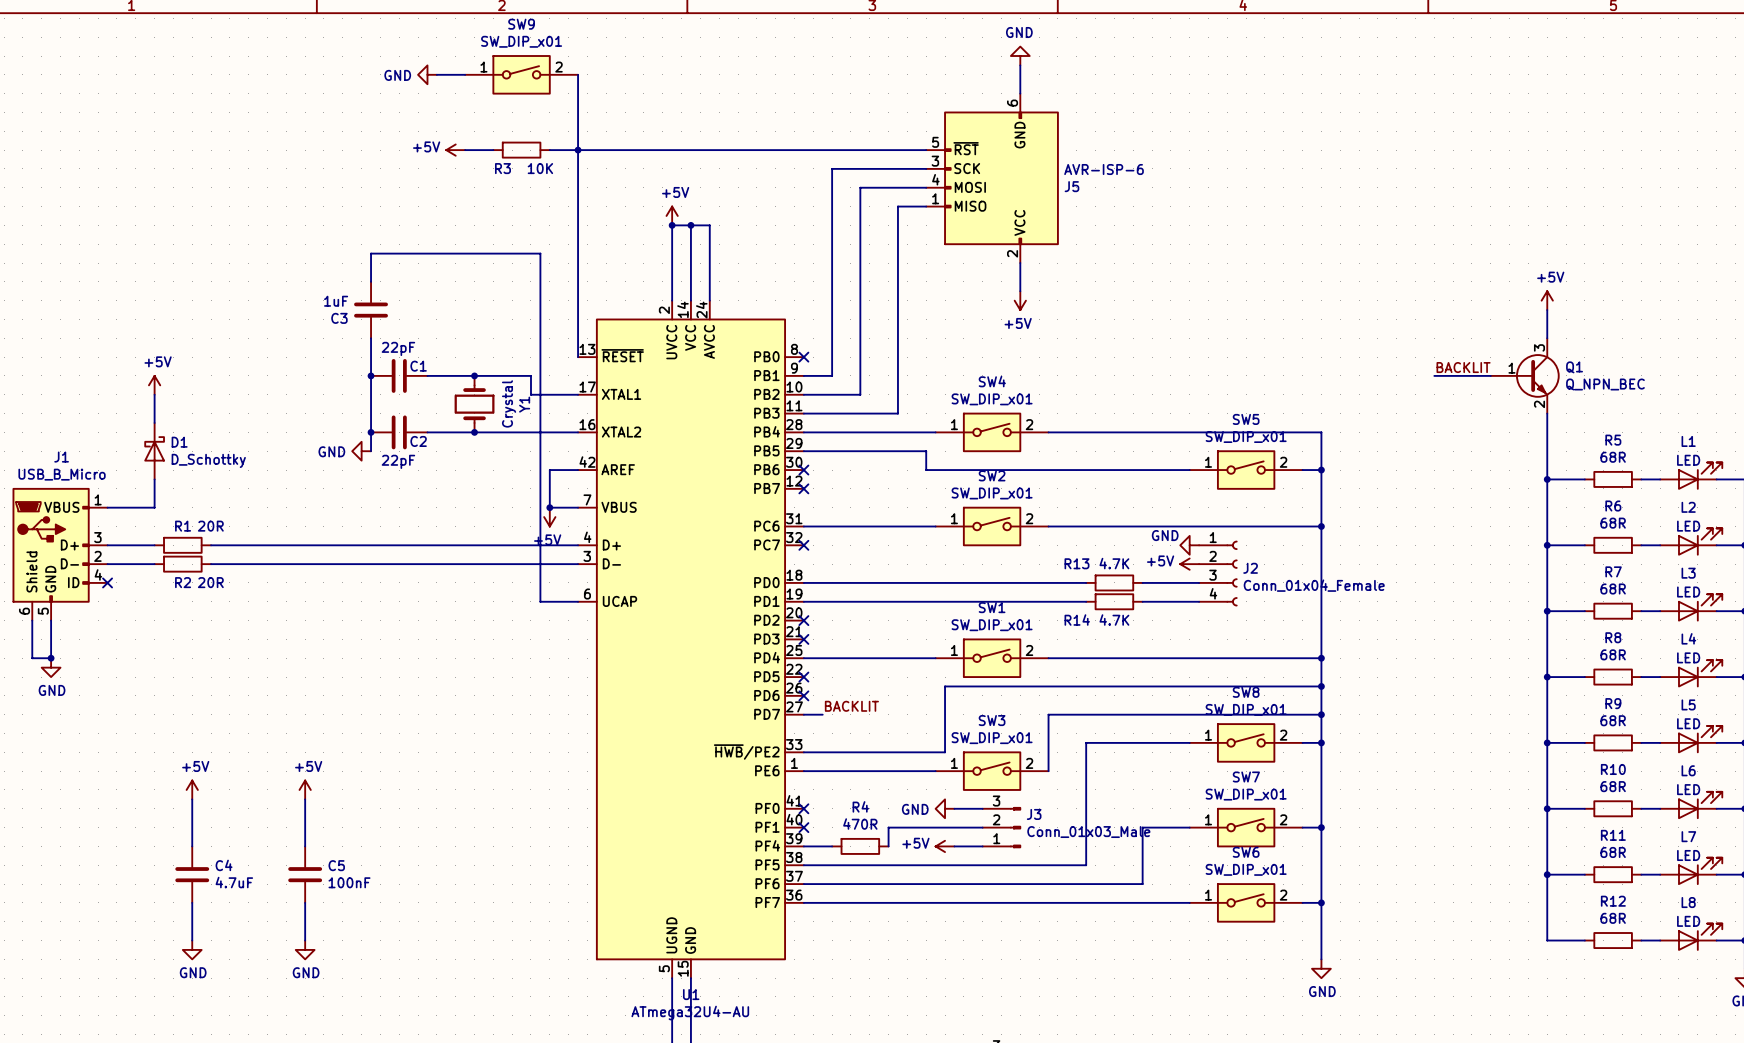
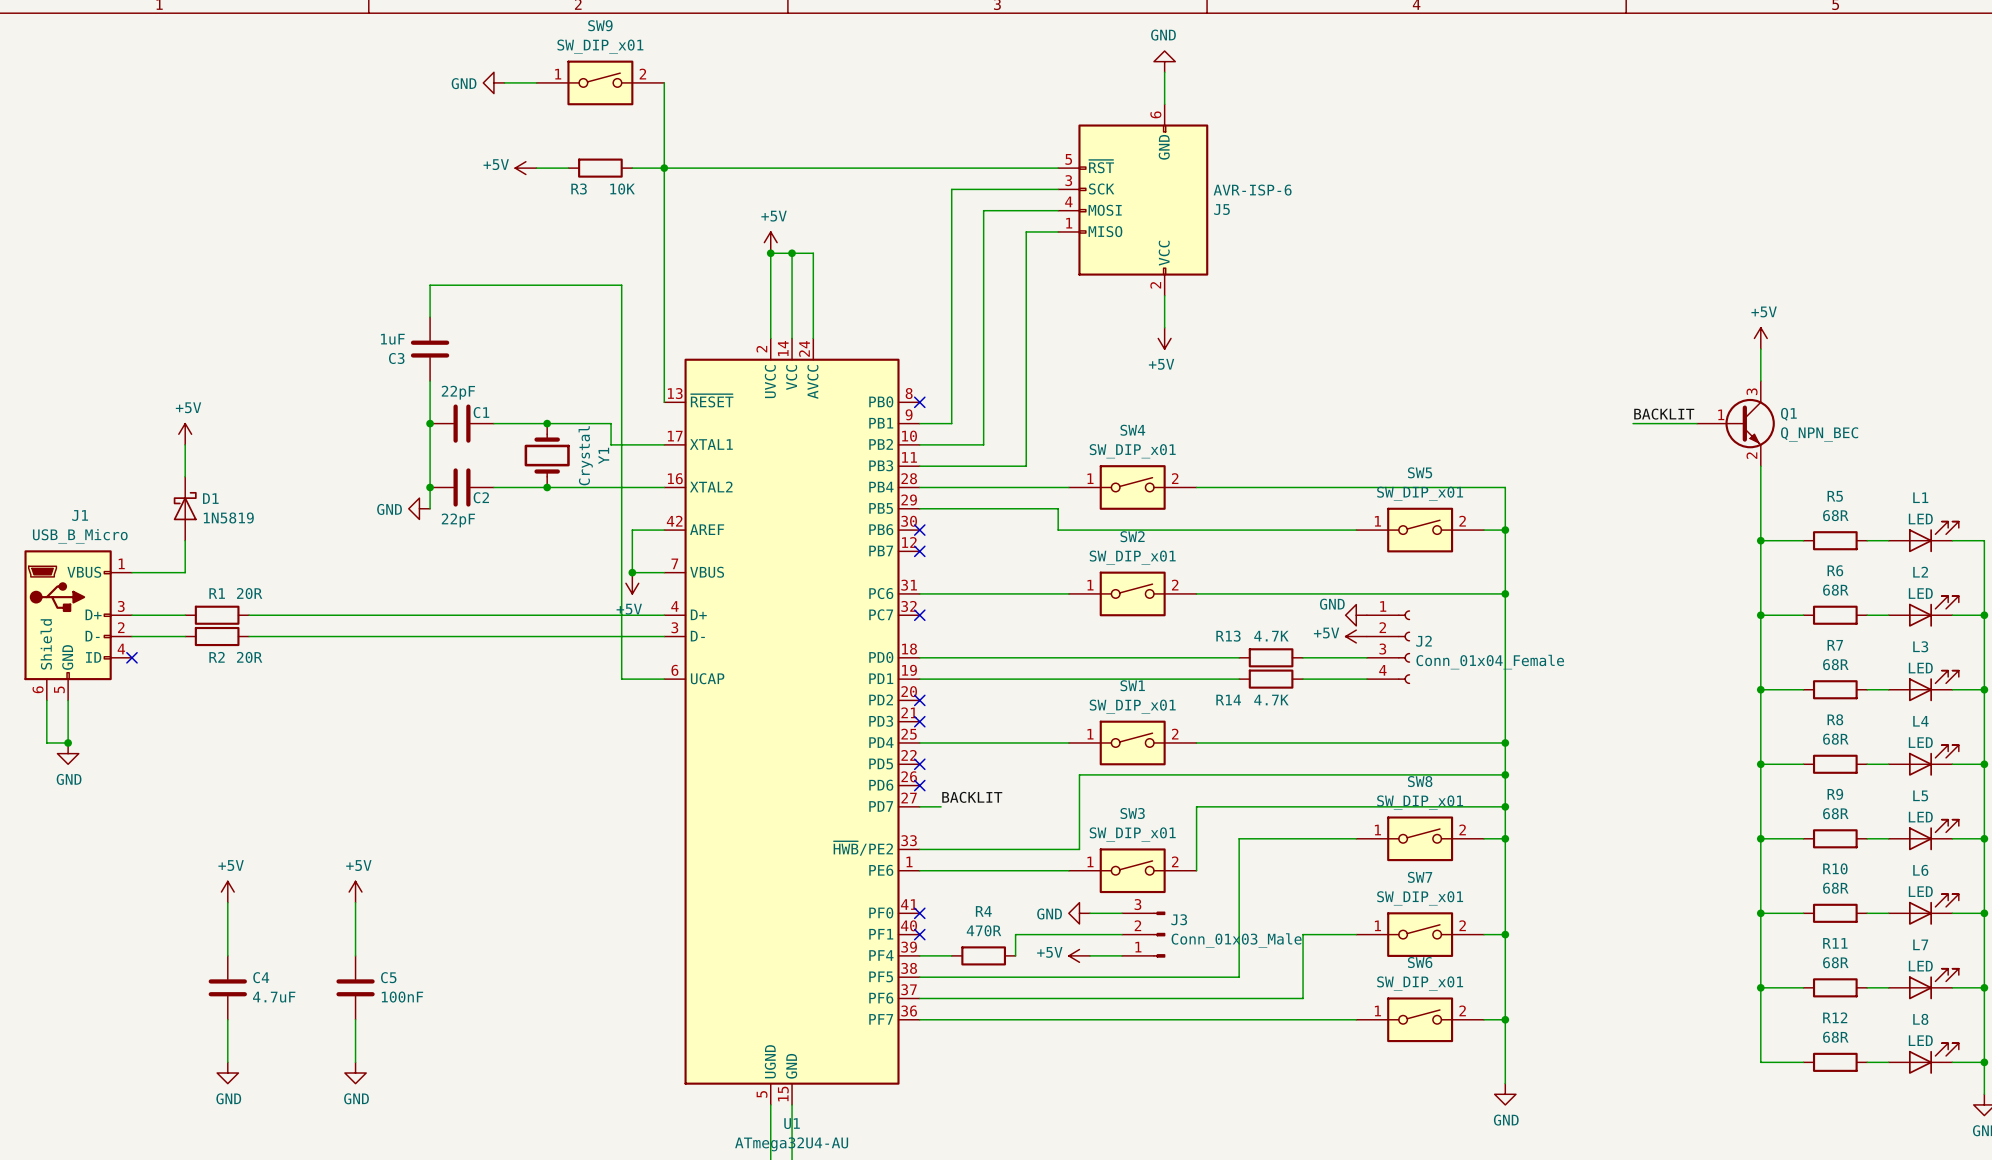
D1 value: D_Schottky (208, 460) -> 1N5819 (228, 517)

